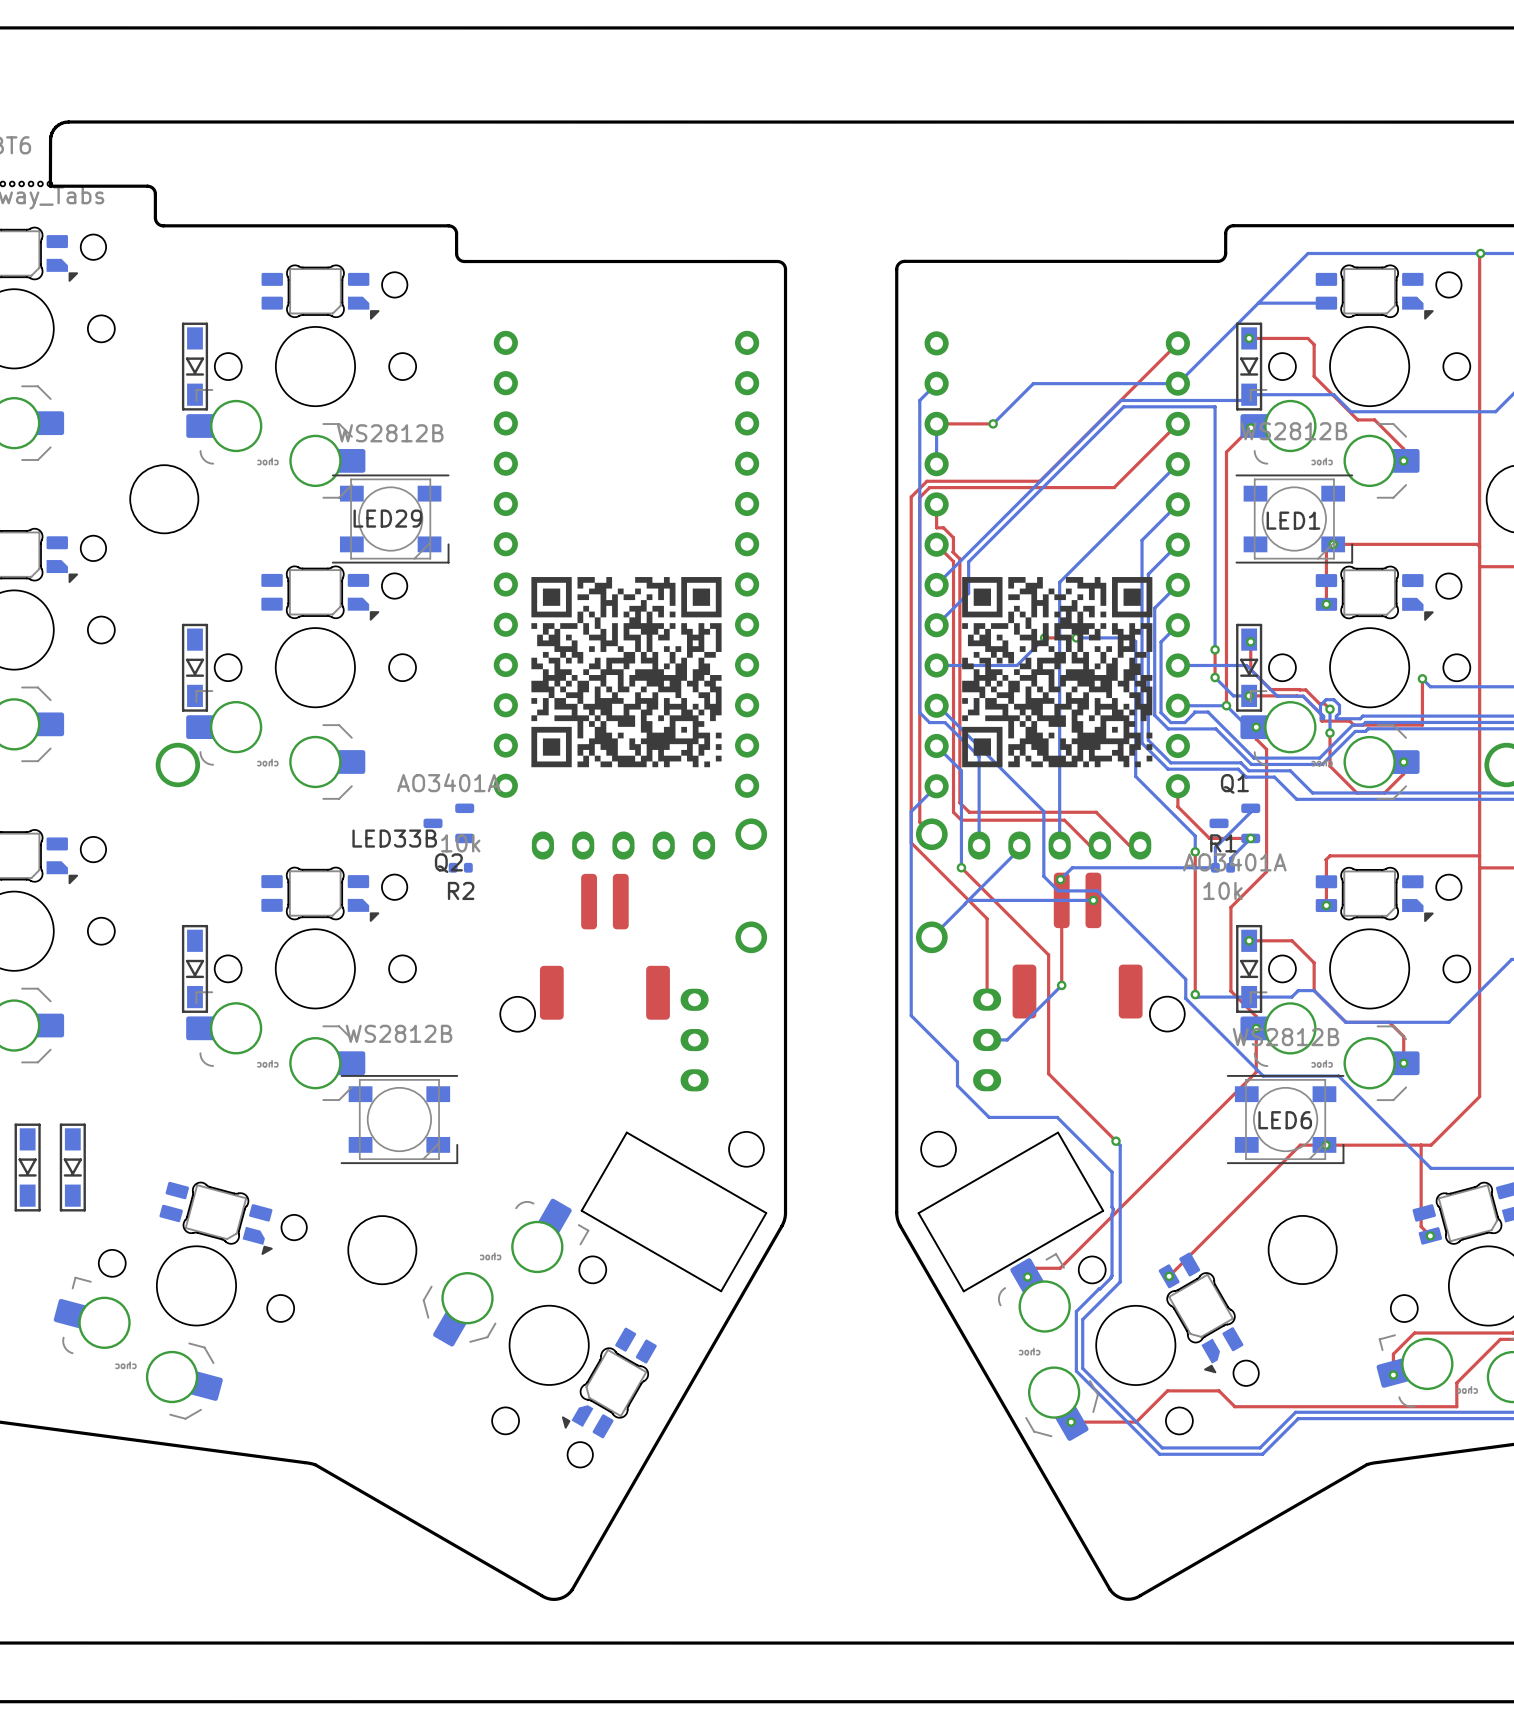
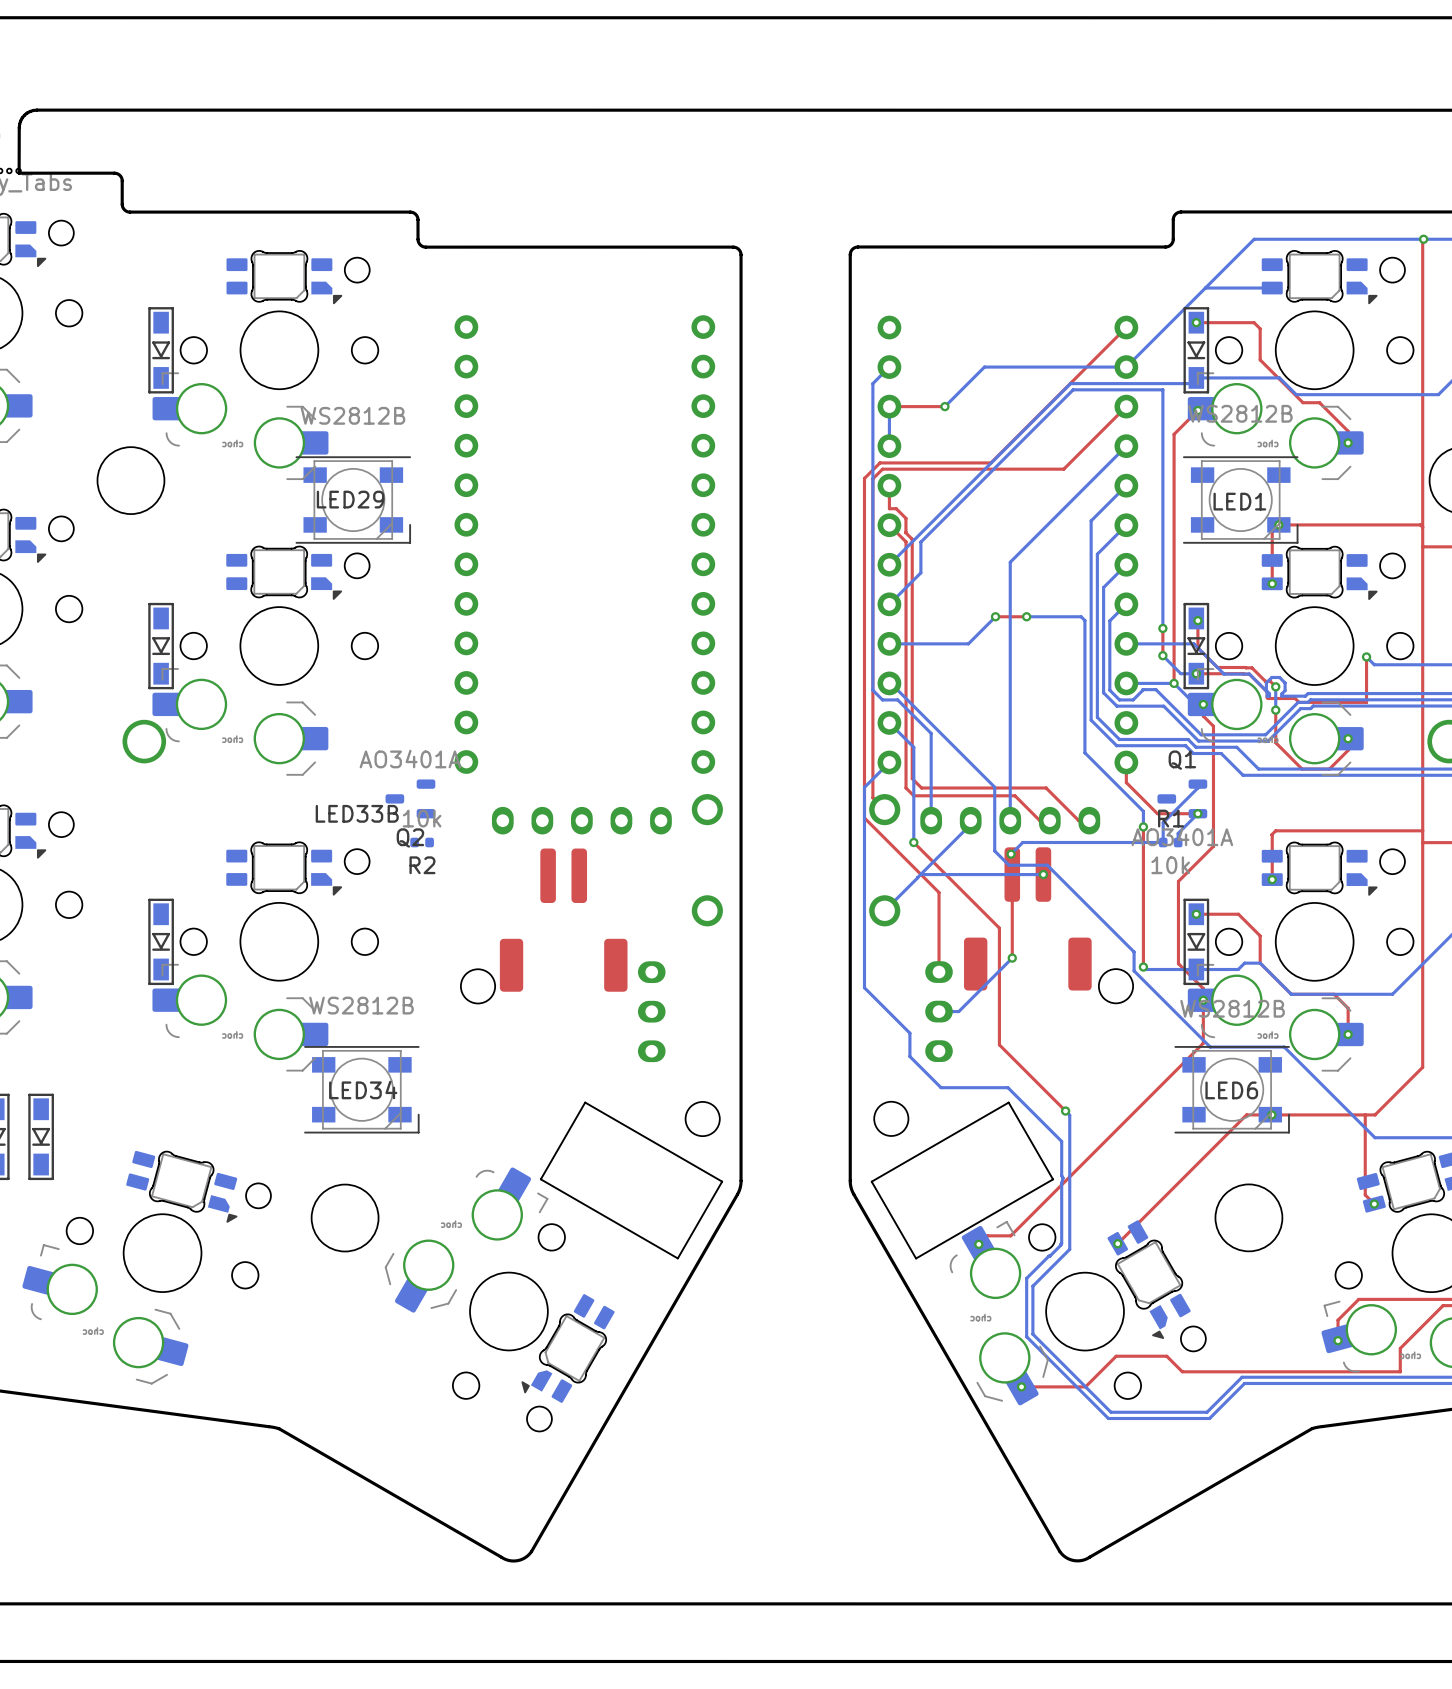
drawing: [531, 577, 722, 768] -> none
drawing: [962, 577, 1153, 768] -> none
LED33B text: none -> LED34 (363, 1089)

